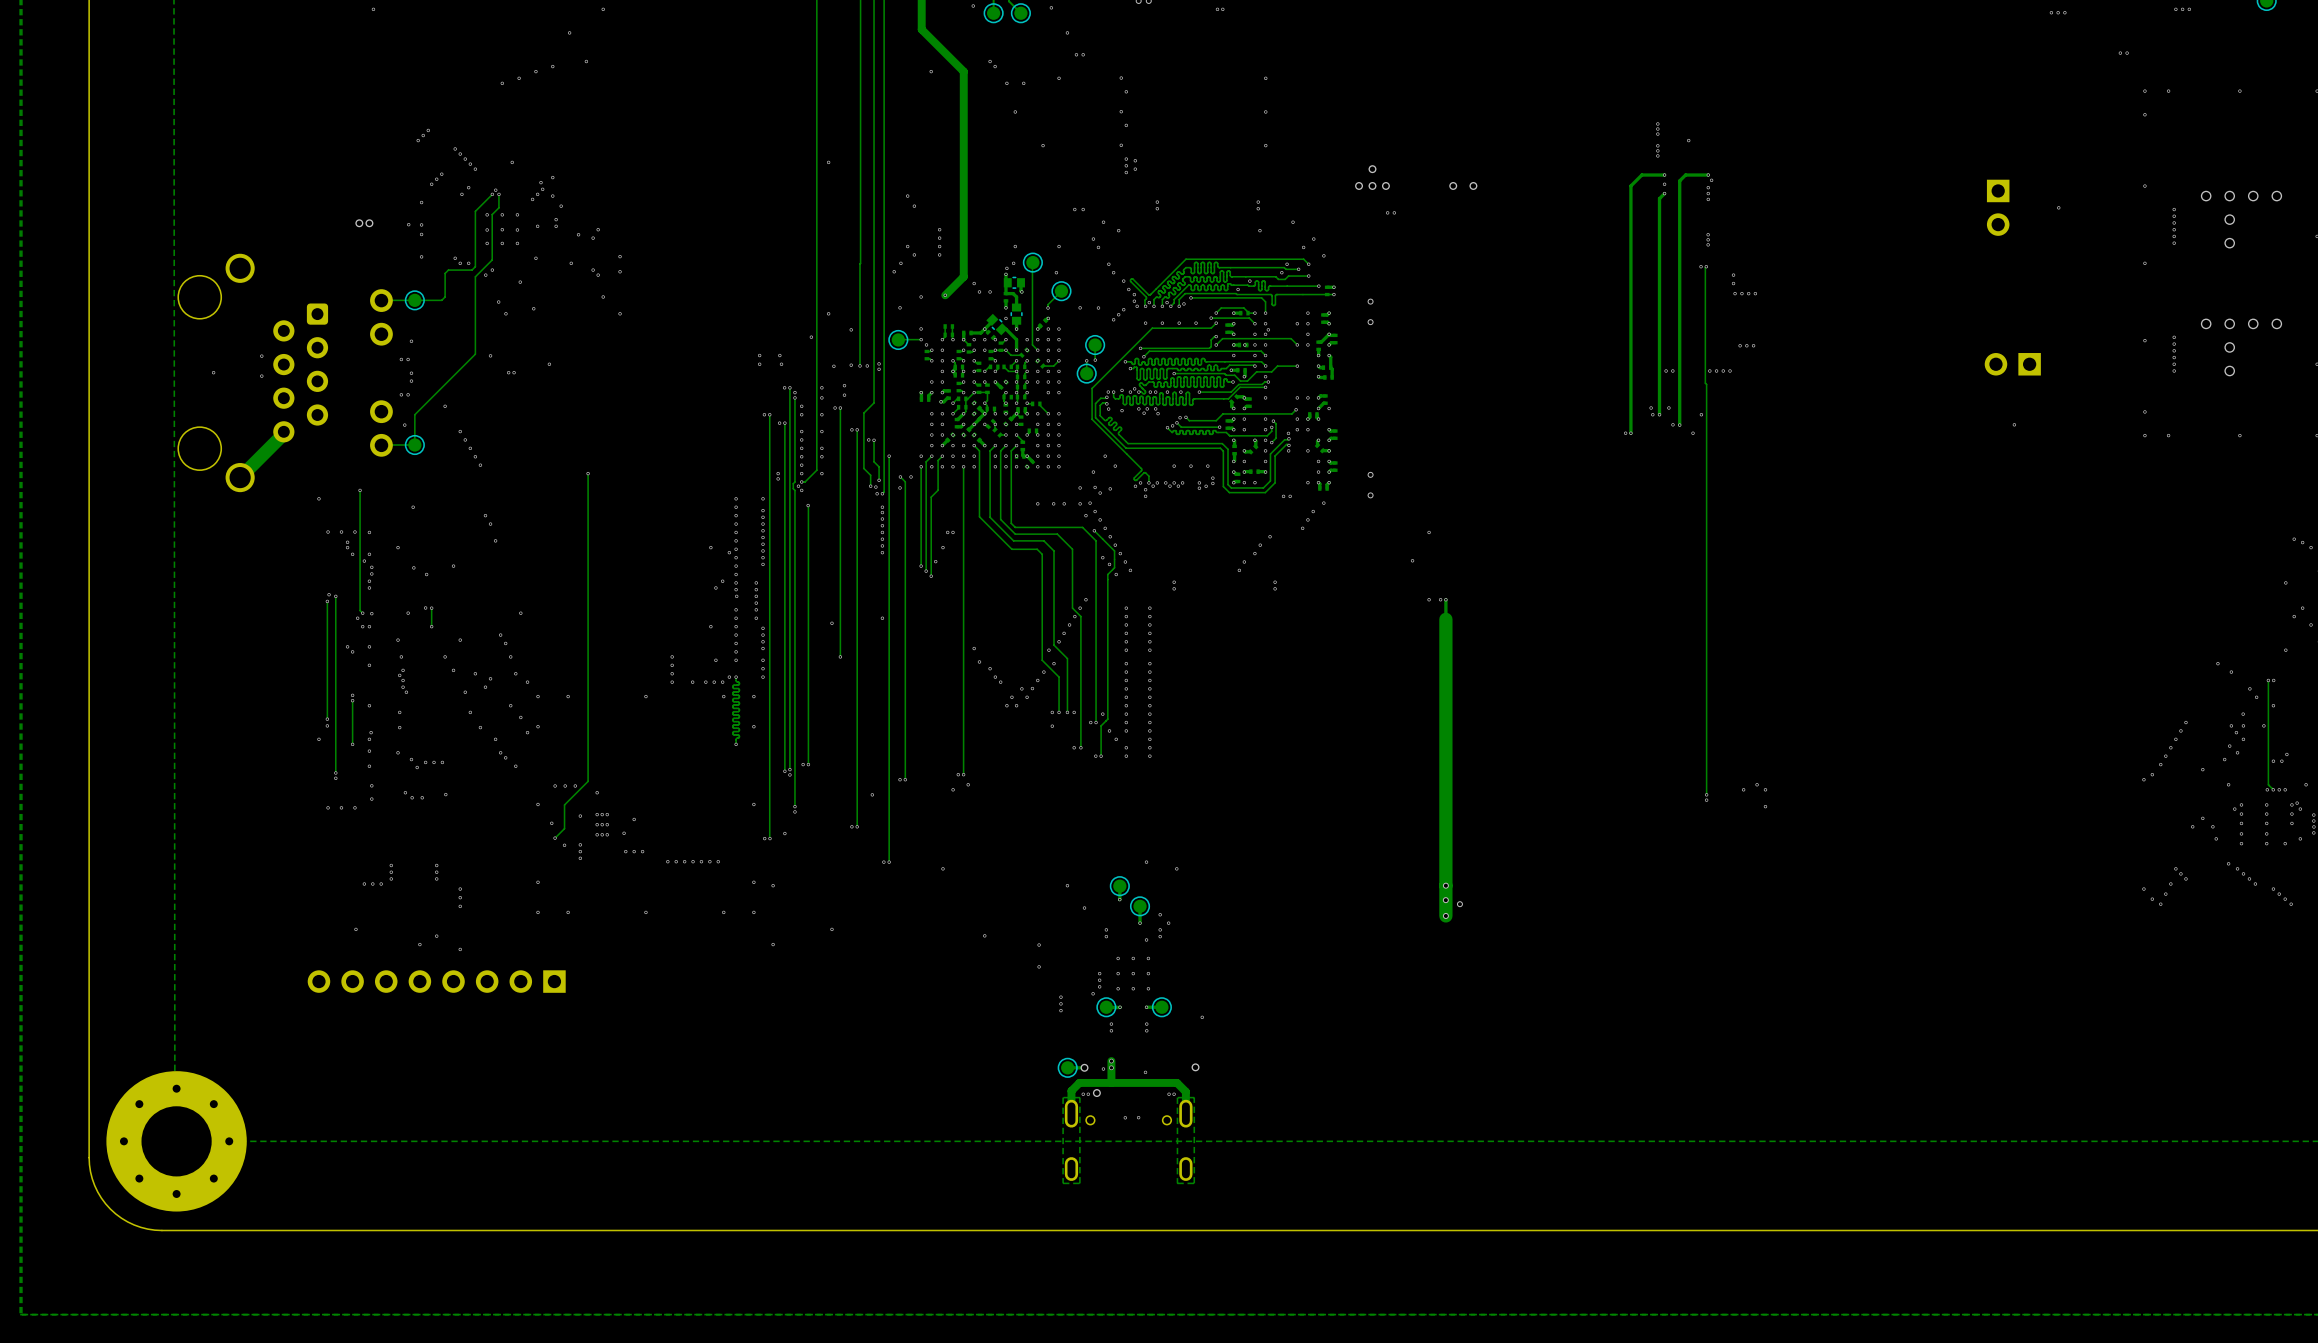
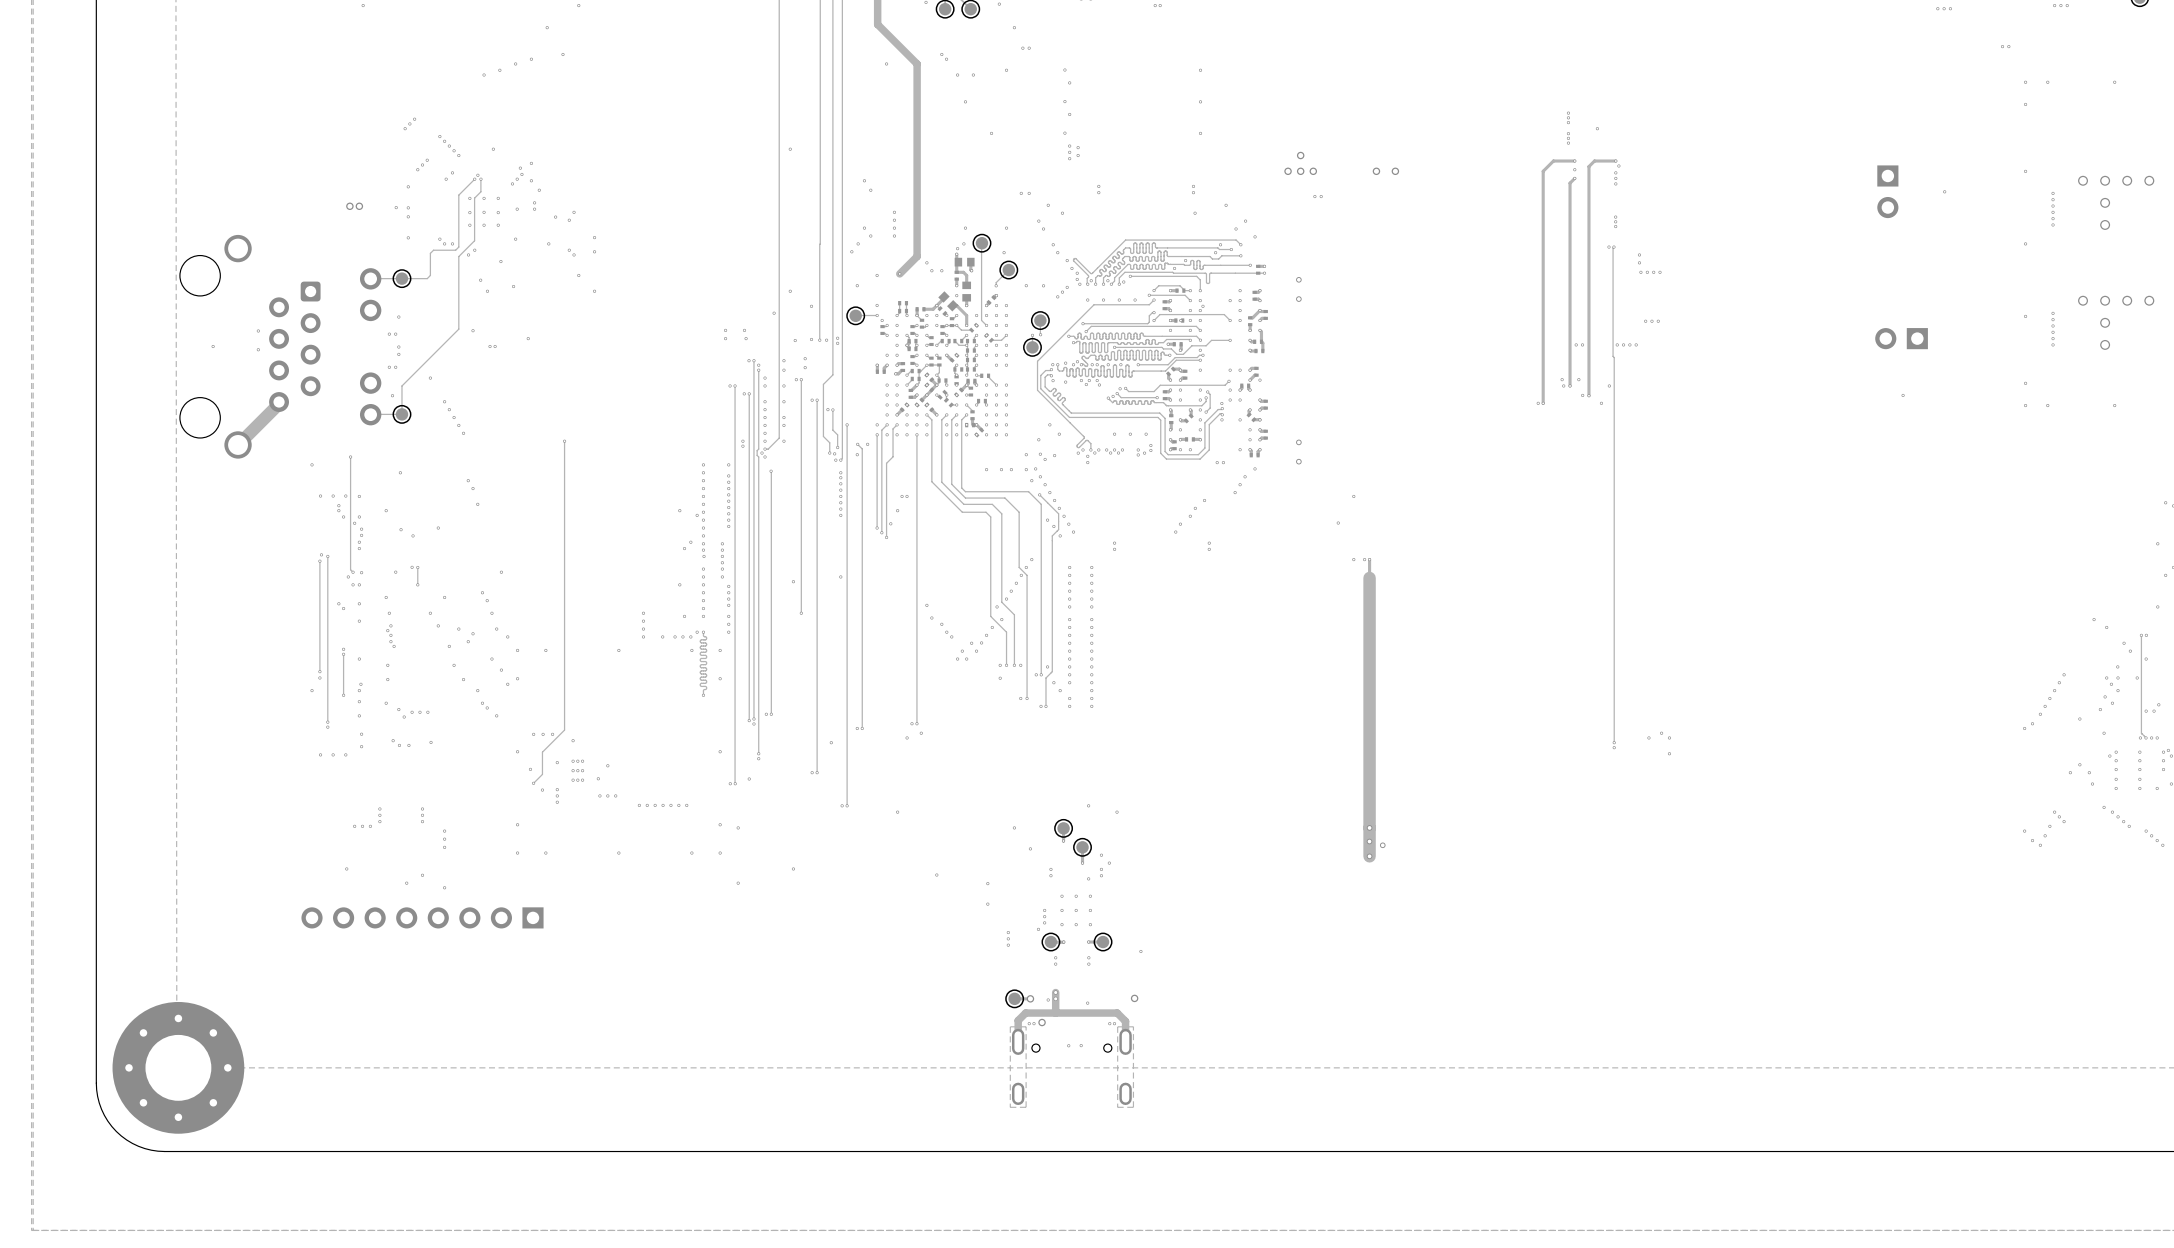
part footprint: [1003, 276, 1025, 289] -> [954, 257, 975, 267]
part footprint: [1010, 303, 1023, 325] -> [962, 281, 972, 302]
part footprint: [986, 313, 1008, 336] -> [938, 291, 959, 312]

